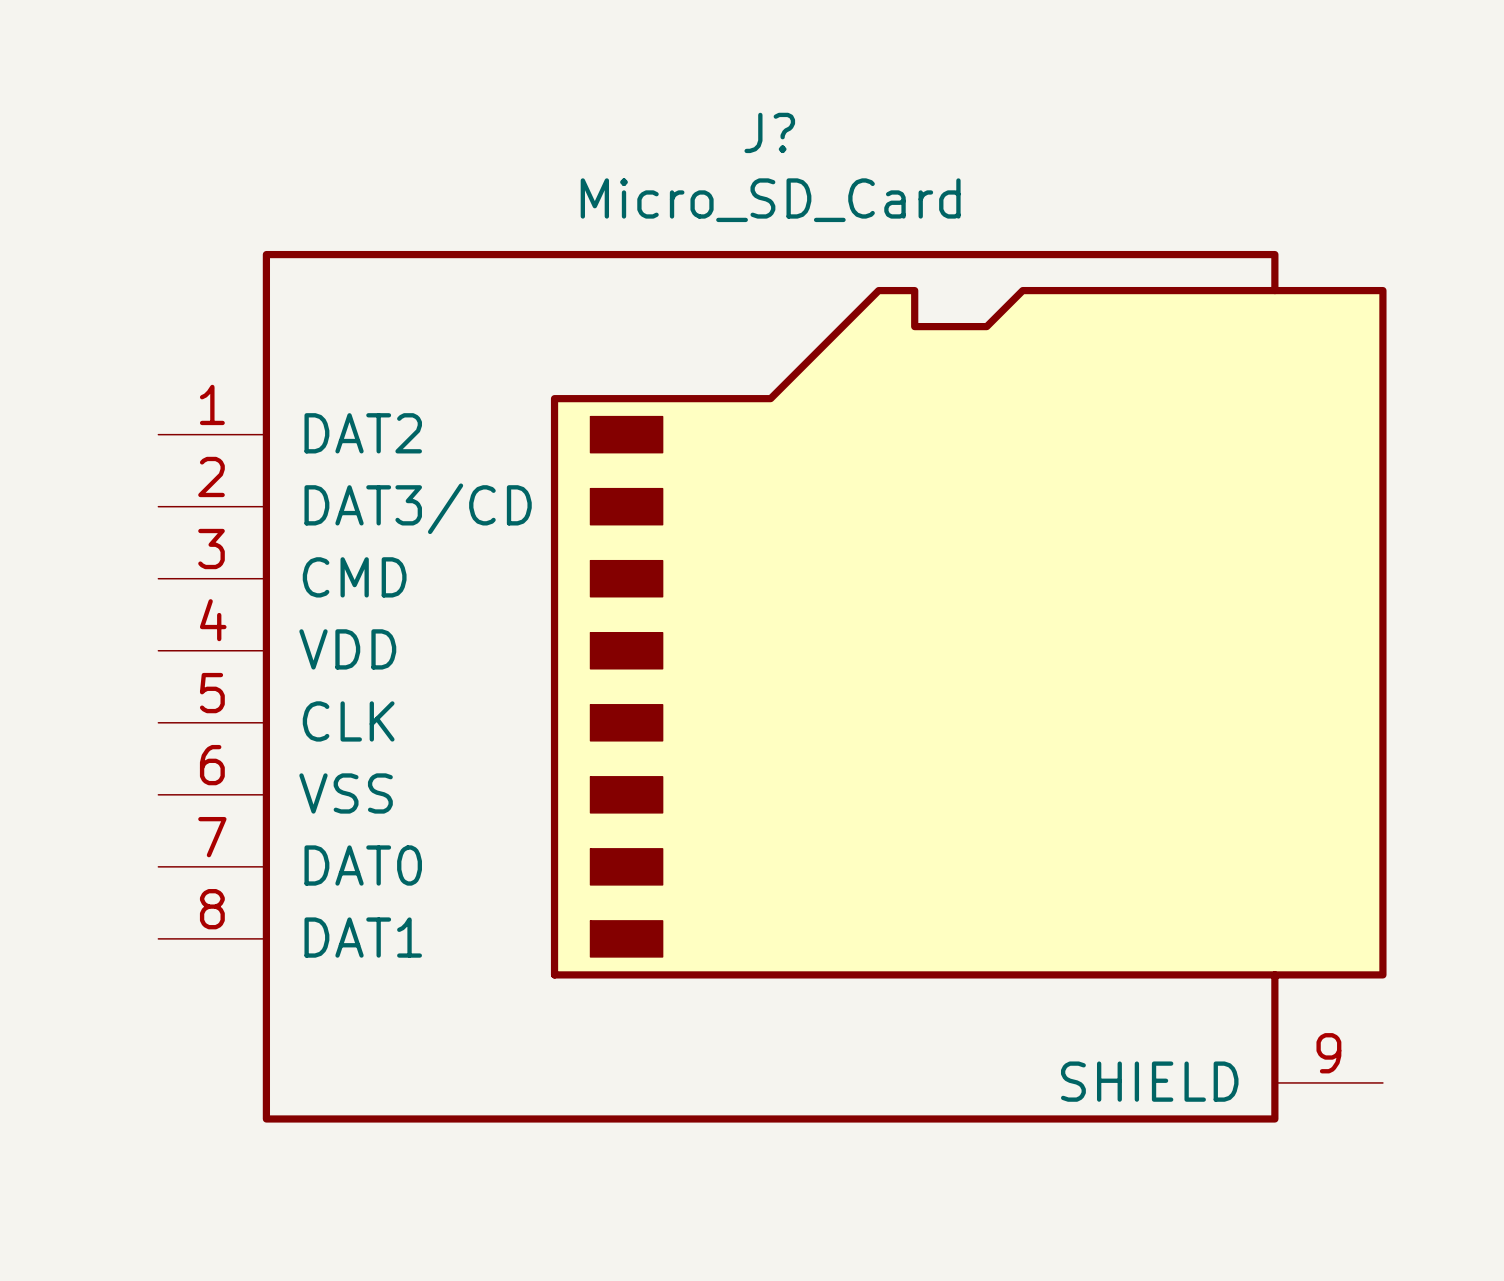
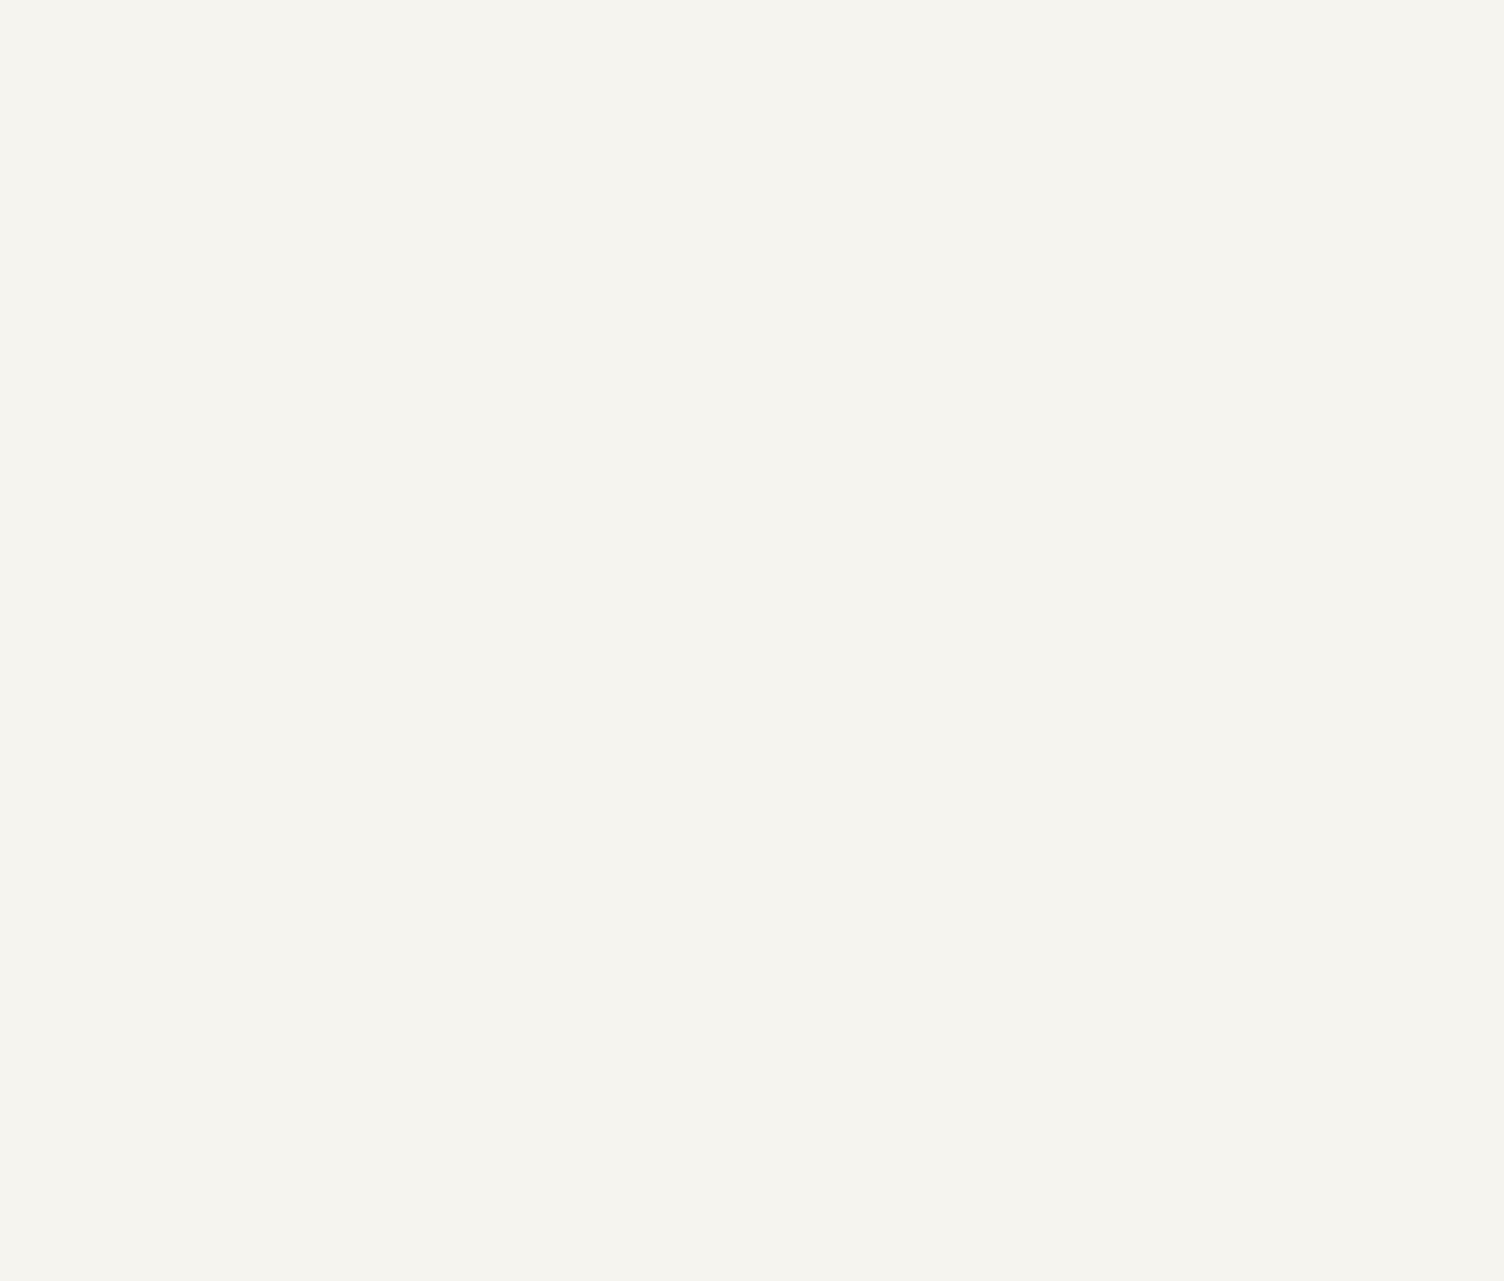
J?: Micro_SD_Card (772, 686) -> none

